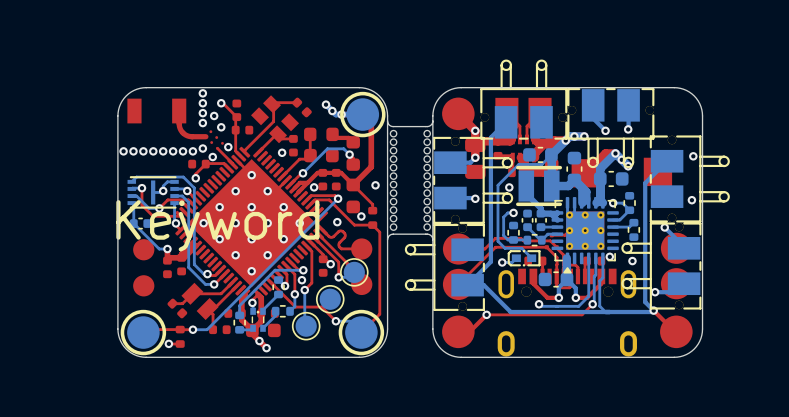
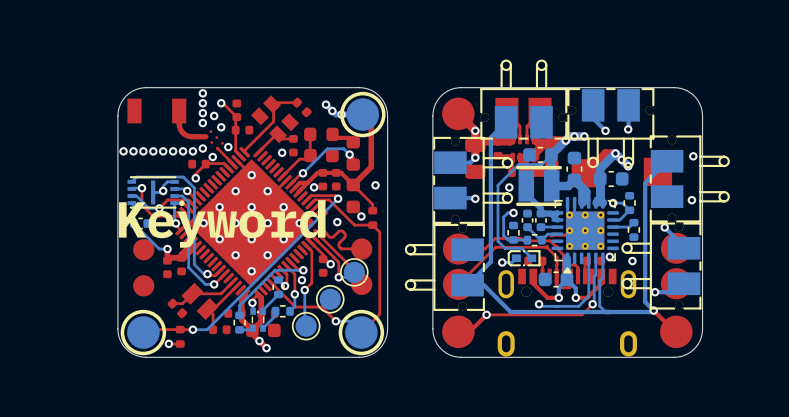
board edge: (432, 120) (431, 124) (427, 126) (392, 126) (387, 120) -> none
round board edge: [390, 130, 398, 138] -> none
round board edge: [423, 130, 431, 138] -> none
round board edge: [390, 138, 398, 146] -> none
round board edge: [423, 138, 431, 146] -> none
round board edge: [390, 147, 398, 155] -> none
round board edge: [423, 147, 431, 155] -> none
round board edge: [390, 155, 398, 163] -> none
round board edge: [423, 155, 431, 163] -> none
round board edge: [390, 164, 398, 172] -> none
round board edge: [423, 164, 431, 172] -> none
round board edge: [390, 172, 398, 180] -> none
round board edge: [423, 172, 431, 180] -> none
round board edge: [390, 181, 398, 189] -> none
round board edge: [423, 181, 431, 189] -> none
round board edge: [390, 189, 398, 197] -> none
round board edge: [423, 189, 431, 197] -> none
round board edge: [390, 198, 398, 206] -> none
round board edge: [423, 198, 431, 206] -> none
round board edge: [390, 206, 398, 214] -> none
round board edge: [423, 206, 431, 214] -> none
round board edge: [390, 215, 398, 223] -> none
round board edge: [423, 215, 431, 223] -> none
round board edge: [390, 223, 398, 231] -> none
round board edge: [423, 223, 431, 231] -> none
board edge: (432, 239) (431, 235) (427, 234) (392, 234) (387, 239) -> none

